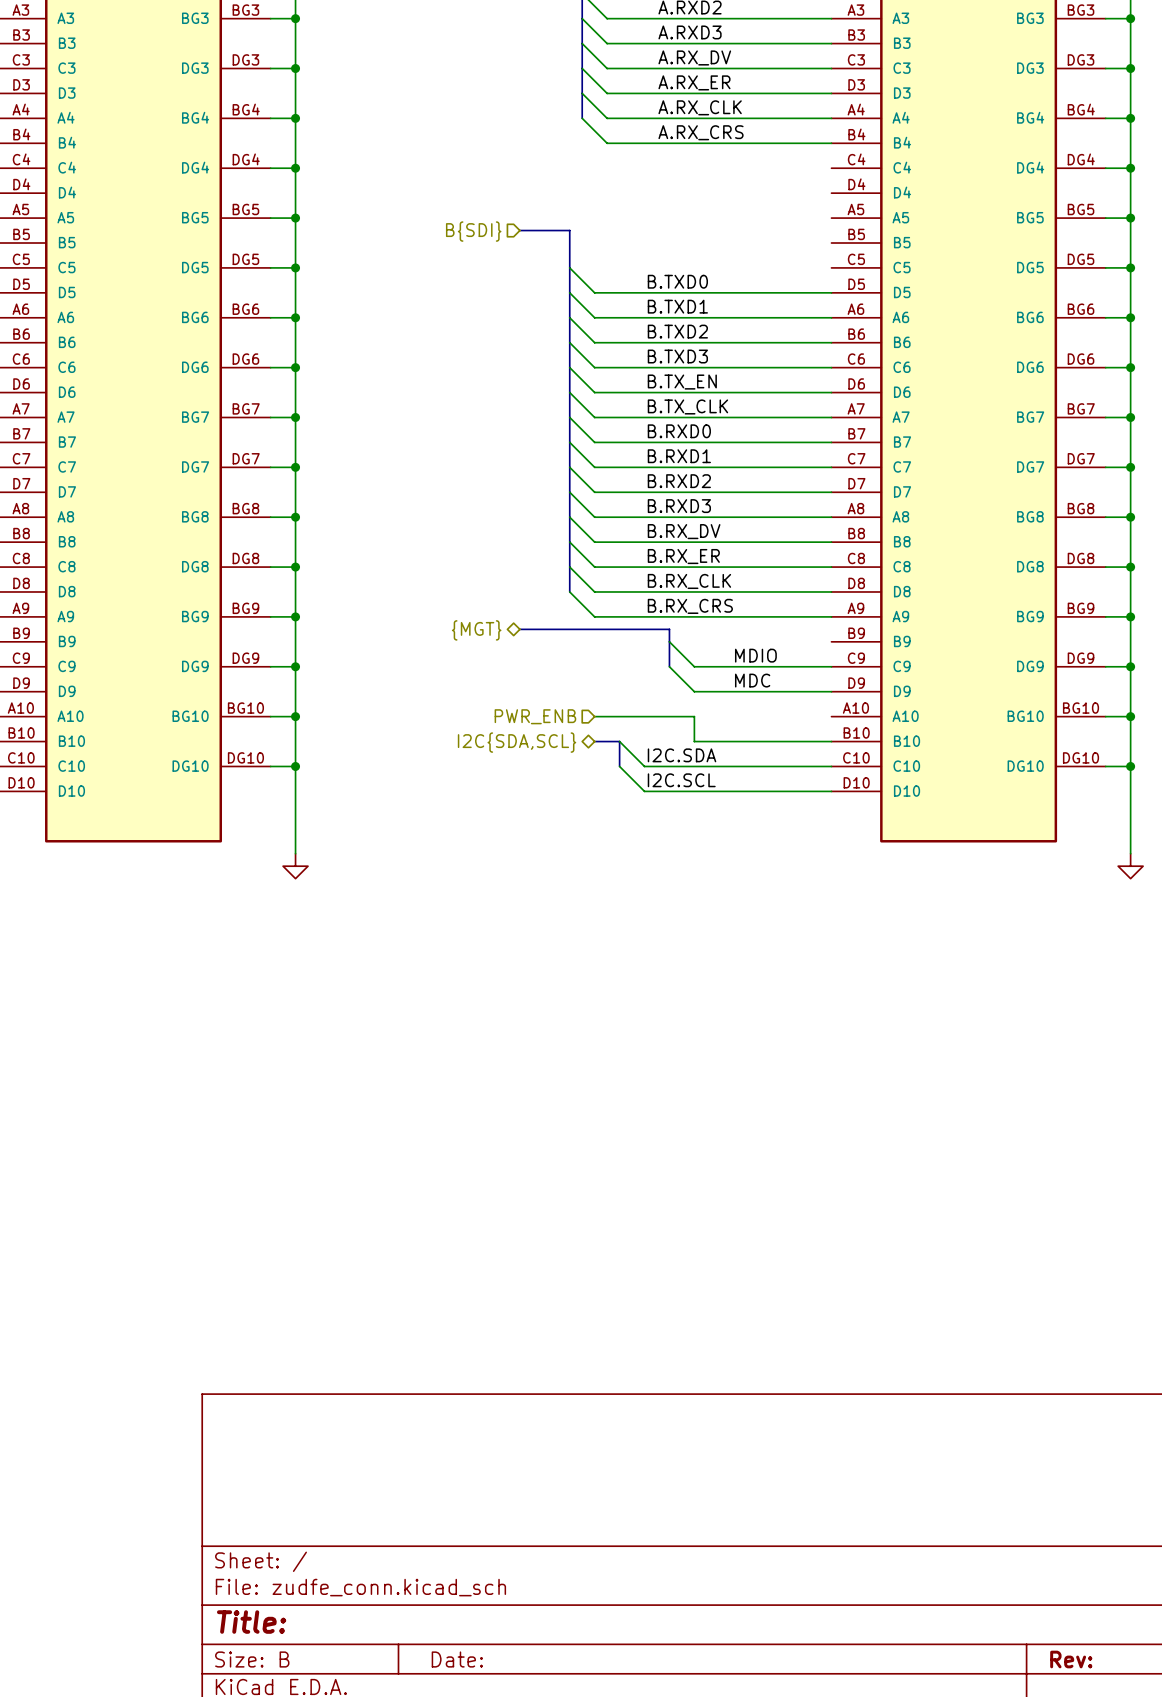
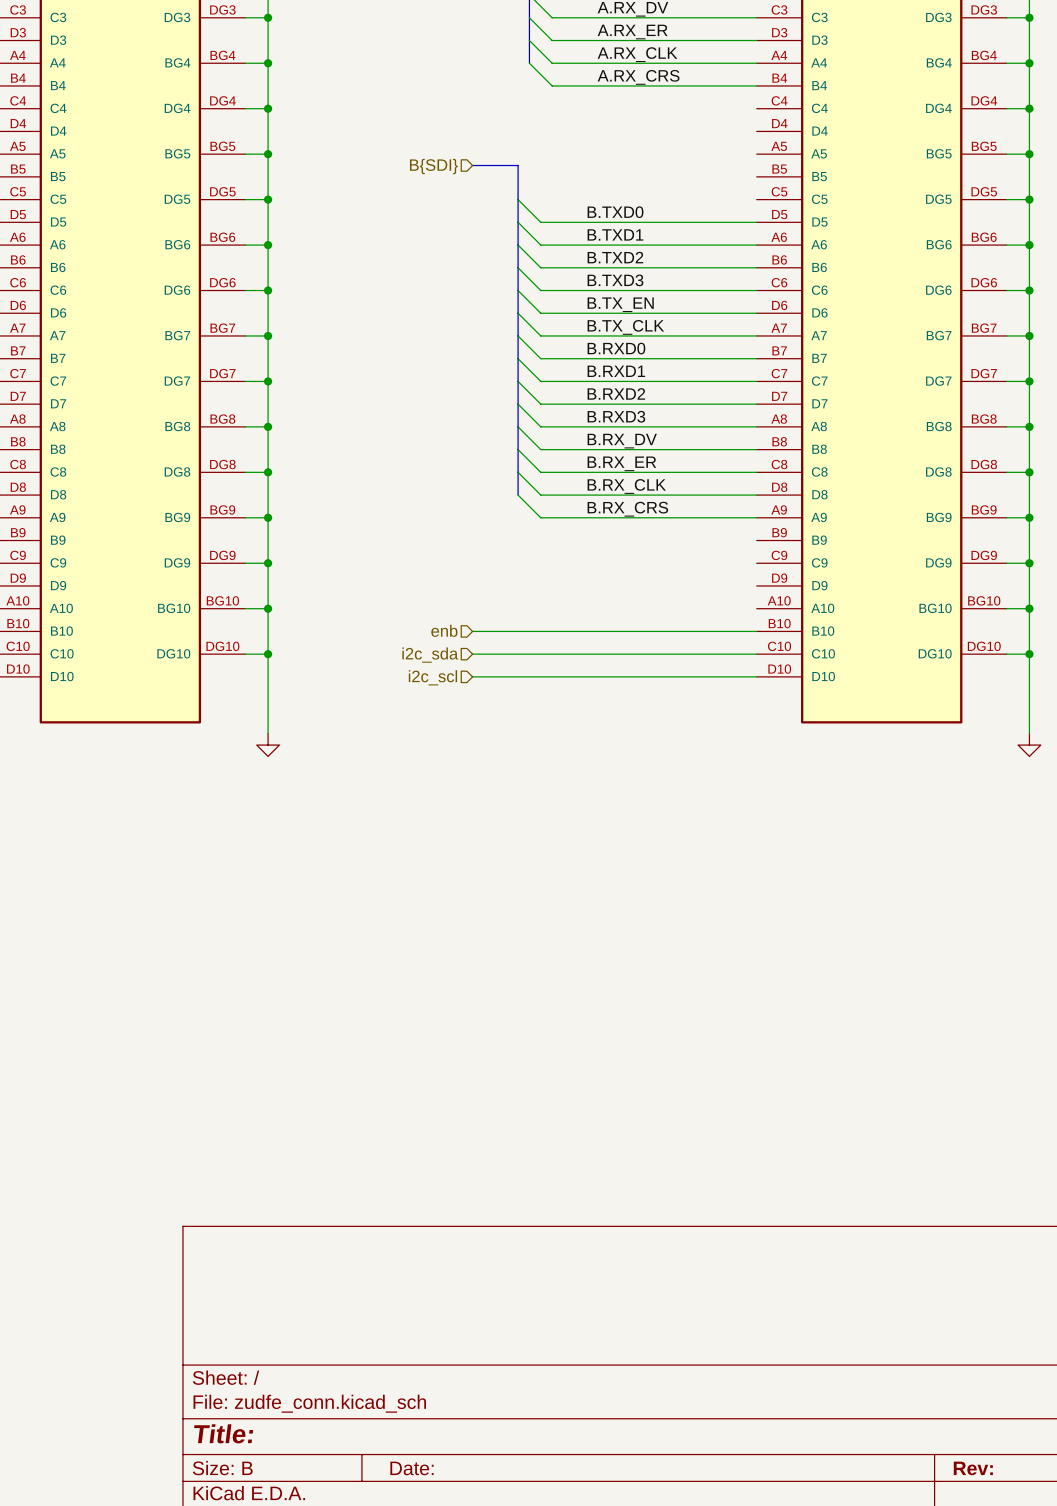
bus: (519, 629) (669, 629) (669, 666) -> none
hierarchical label: {MGT} (476, 630) -> none
wire: (669, 641) (694, 666) (831, 666) -> none
label: MDIO (755, 655) -> none
wire: (669, 666) (694, 691) (831, 691) -> none
label: MDC (752, 680) -> none
hierarchical label: PWR_ENB (535, 716) -> none
wire: (594, 716) (694, 716) (694, 741) -> (472, 631) (631, 631)
hierarchical label: none -> enb (444, 630)
bus: (594, 741) (619, 741) (619, 766) -> none
wire: (619, 741) (644, 766) -> (472, 654) (586, 654)
hierarchical label: I2C{SDA,SCL} (517, 742) -> none
label: I2C.SDA (682, 755) -> none
hierarchical label: none -> i2c_sda (430, 655)
wire: (619, 766) (644, 791) -> (472, 676) (586, 676)
label: I2C.SCL (681, 780) -> none
hierarchical label: none -> i2c_scl (432, 677)

